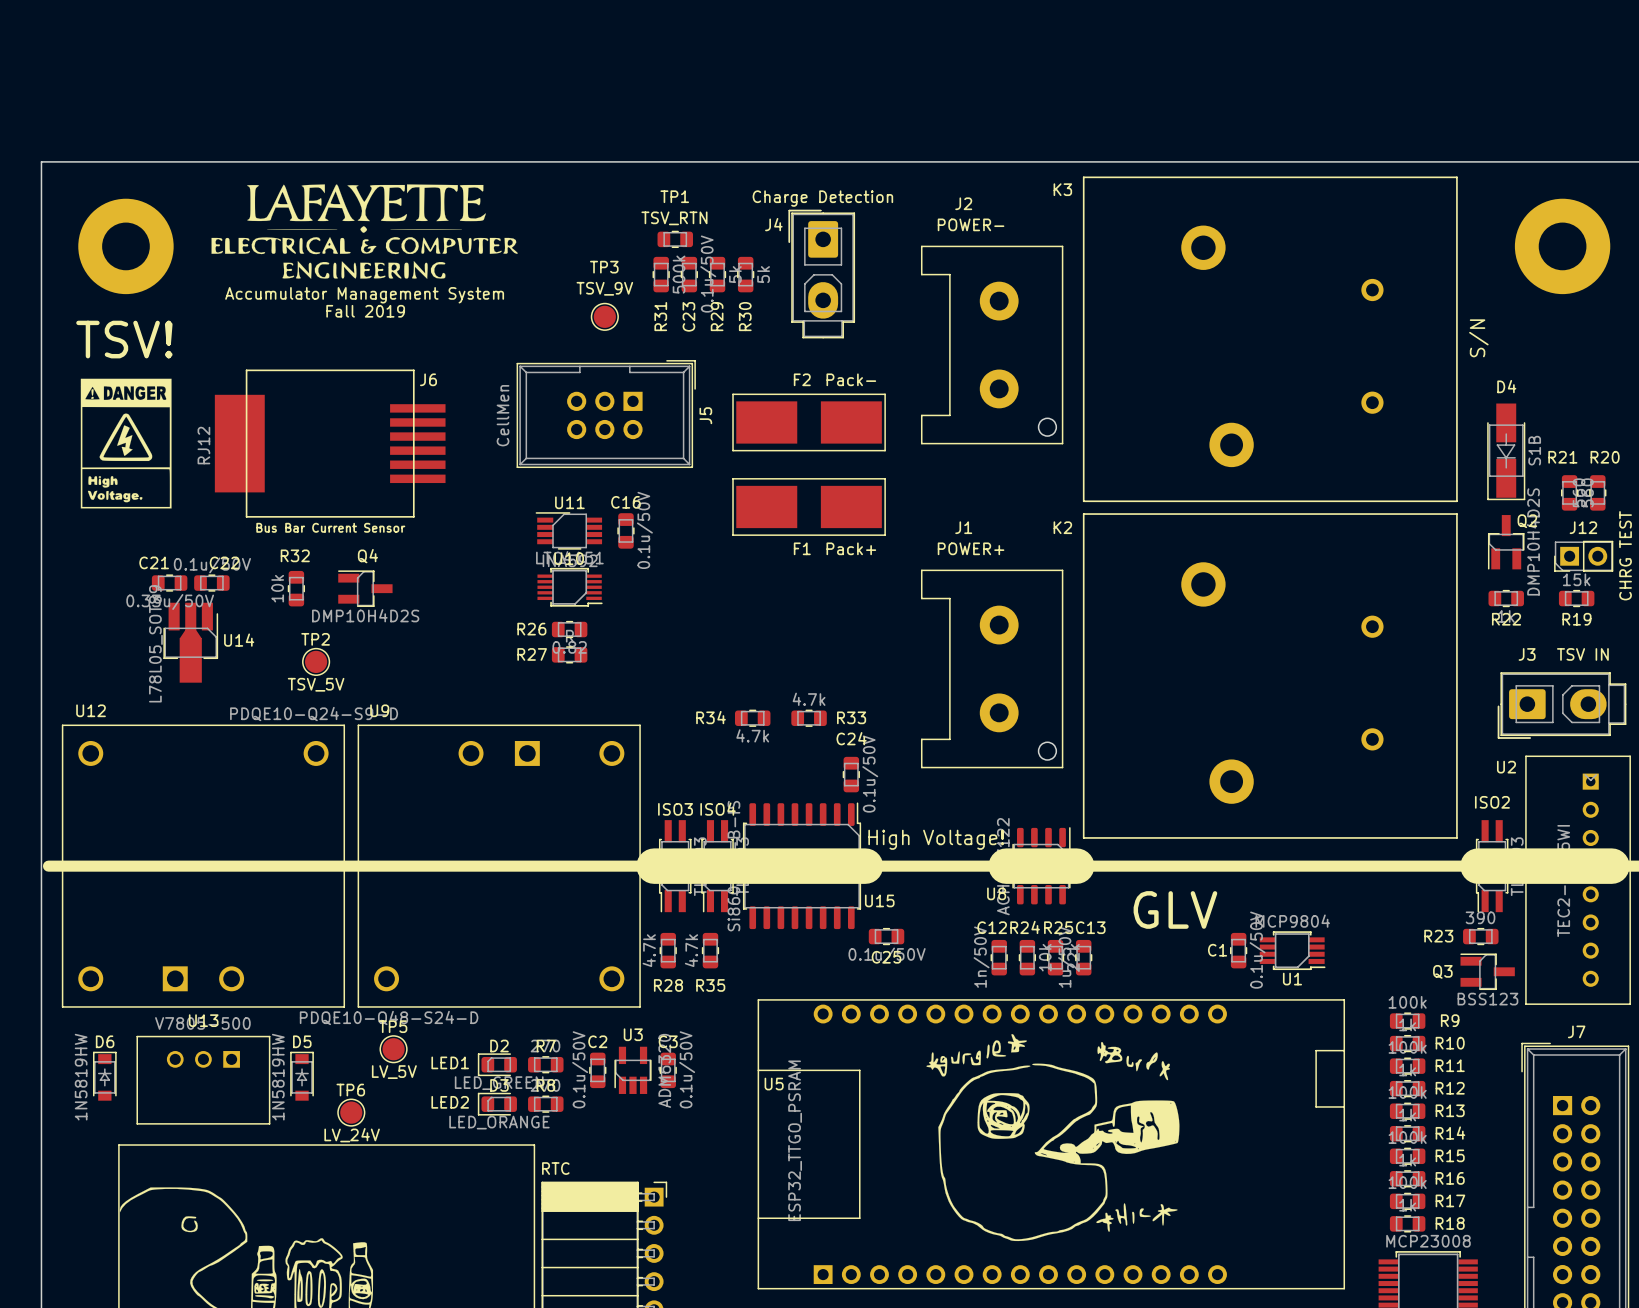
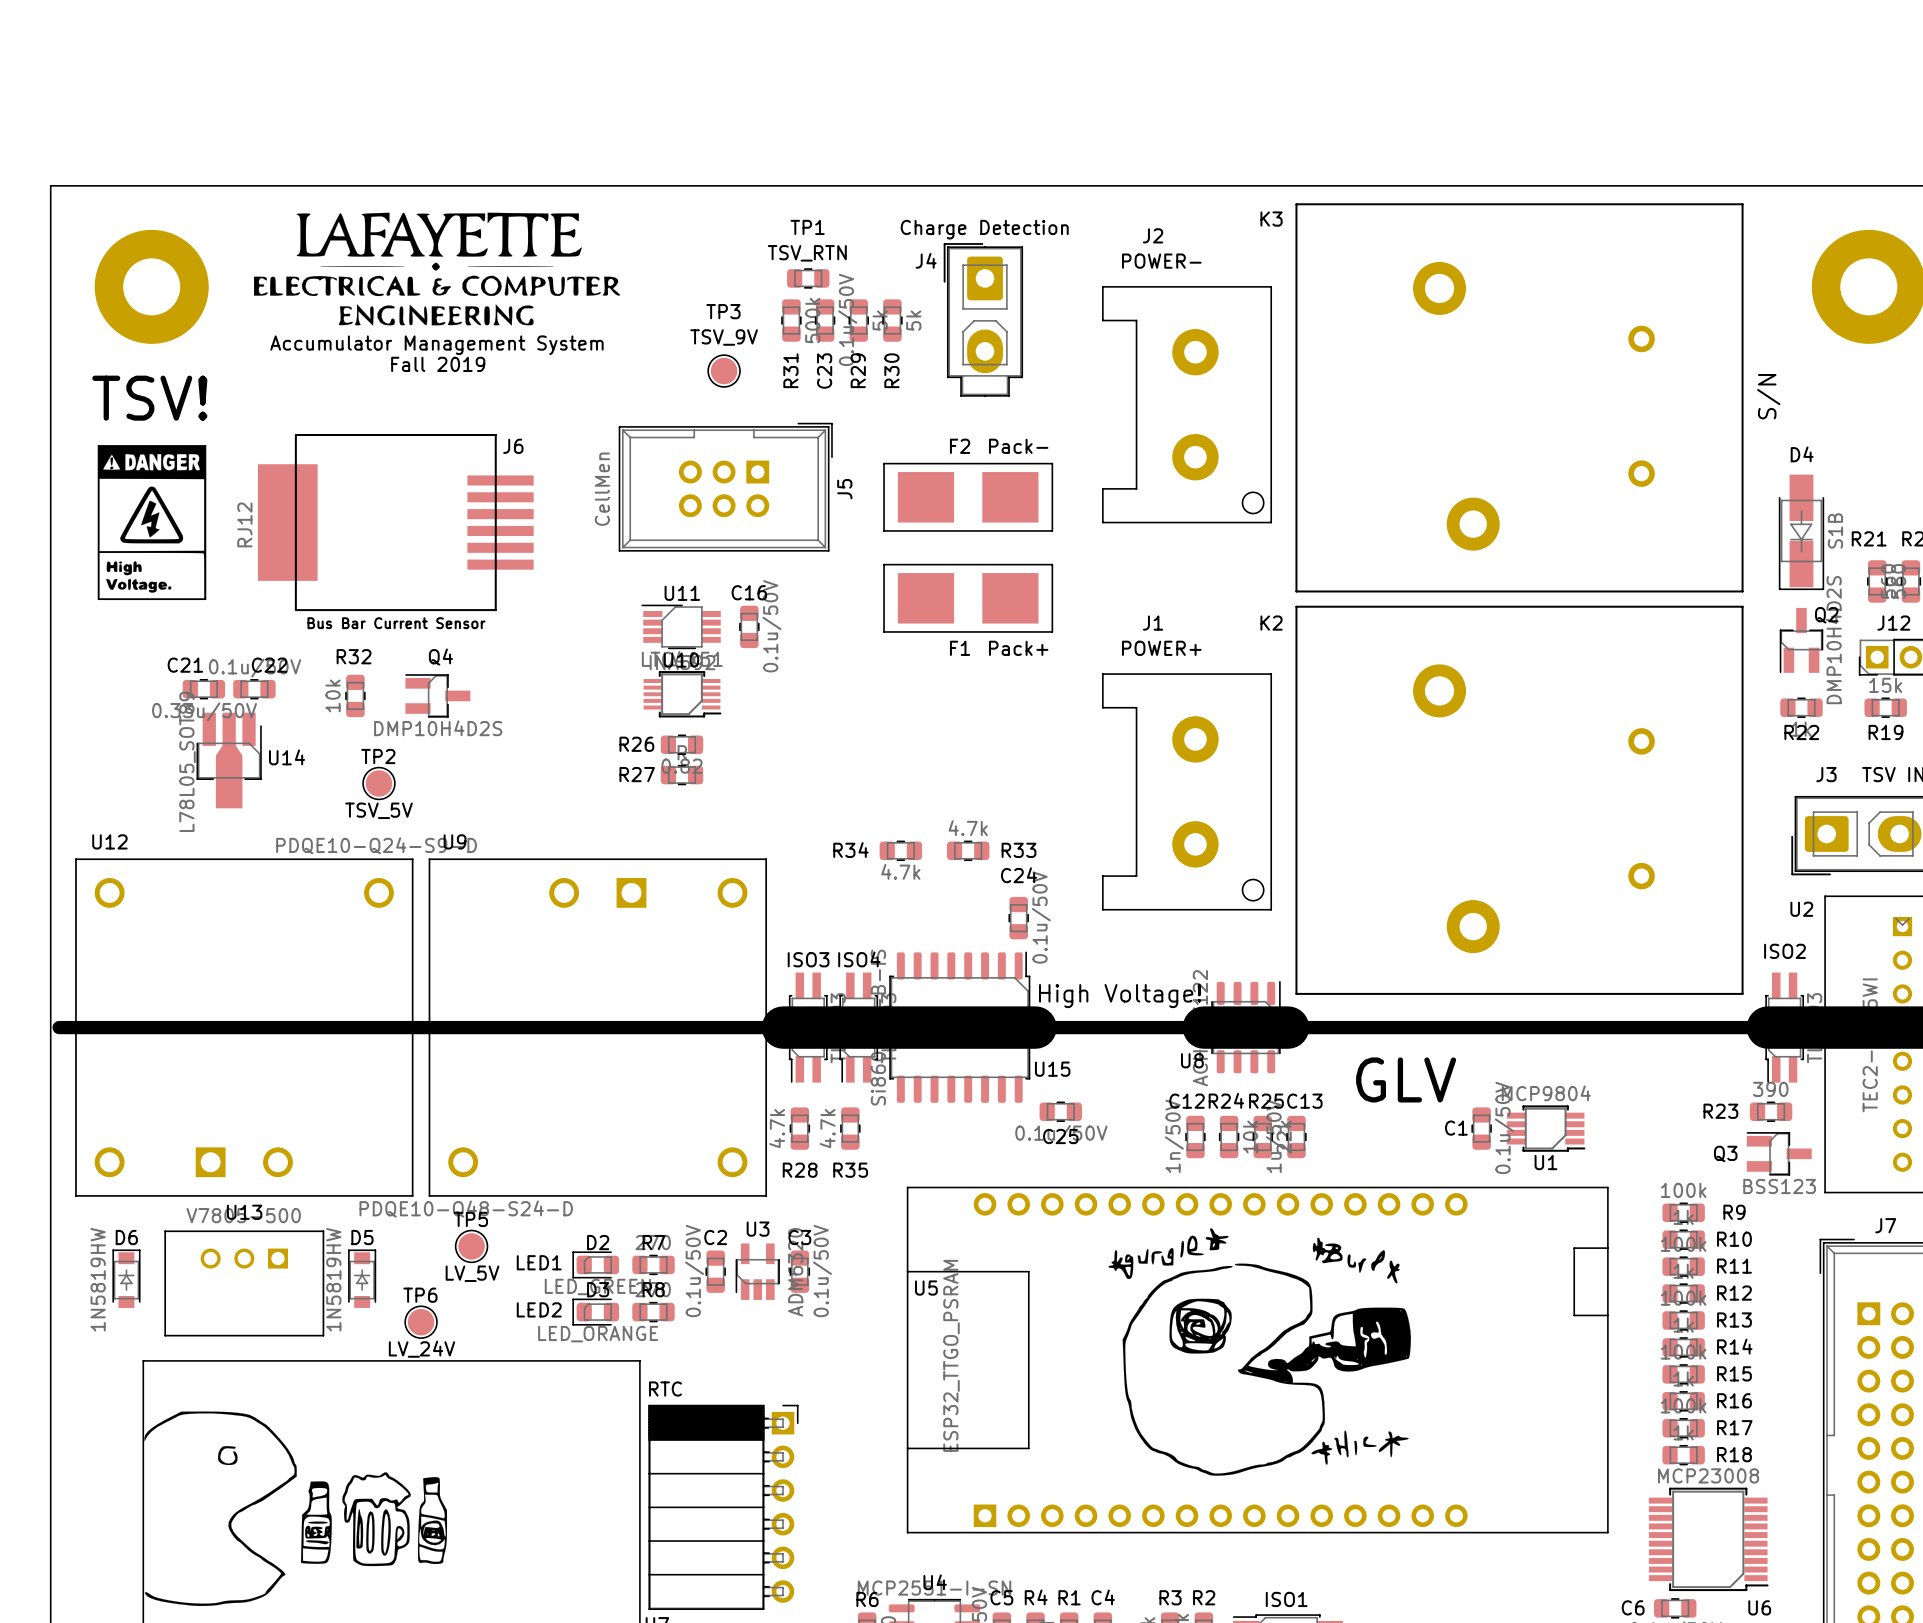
F2 footprint: [732, 393, 886, 452] -> [883, 462, 1054, 532]
F1 footprint: [732, 478, 886, 536] -> [883, 563, 1054, 633]

